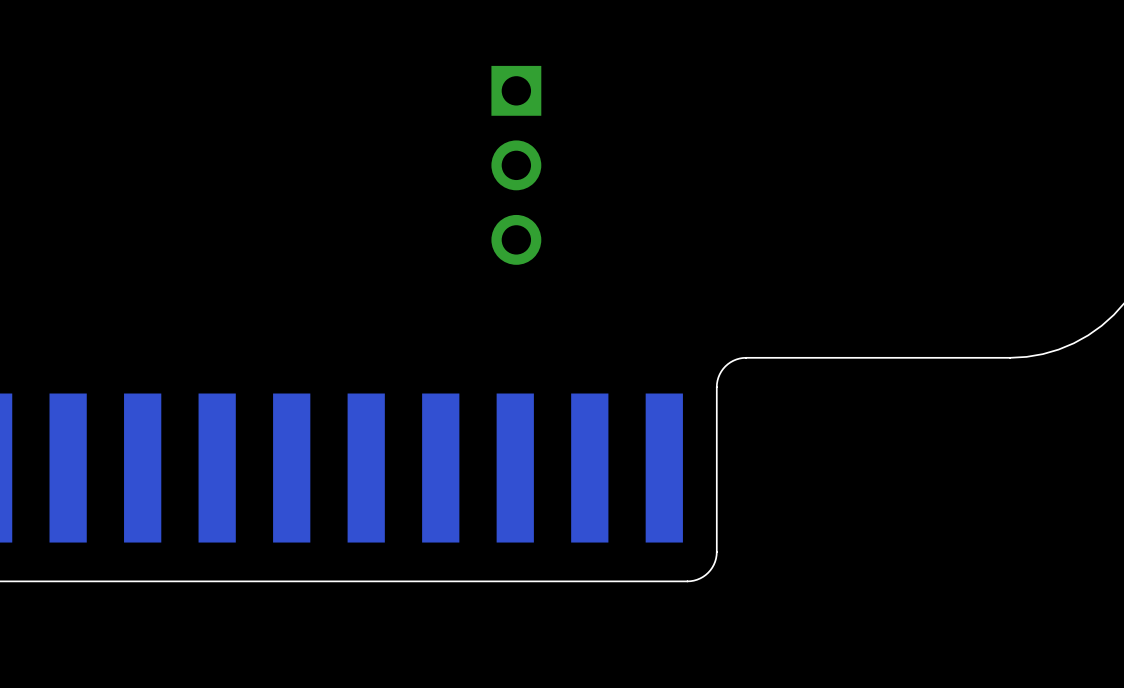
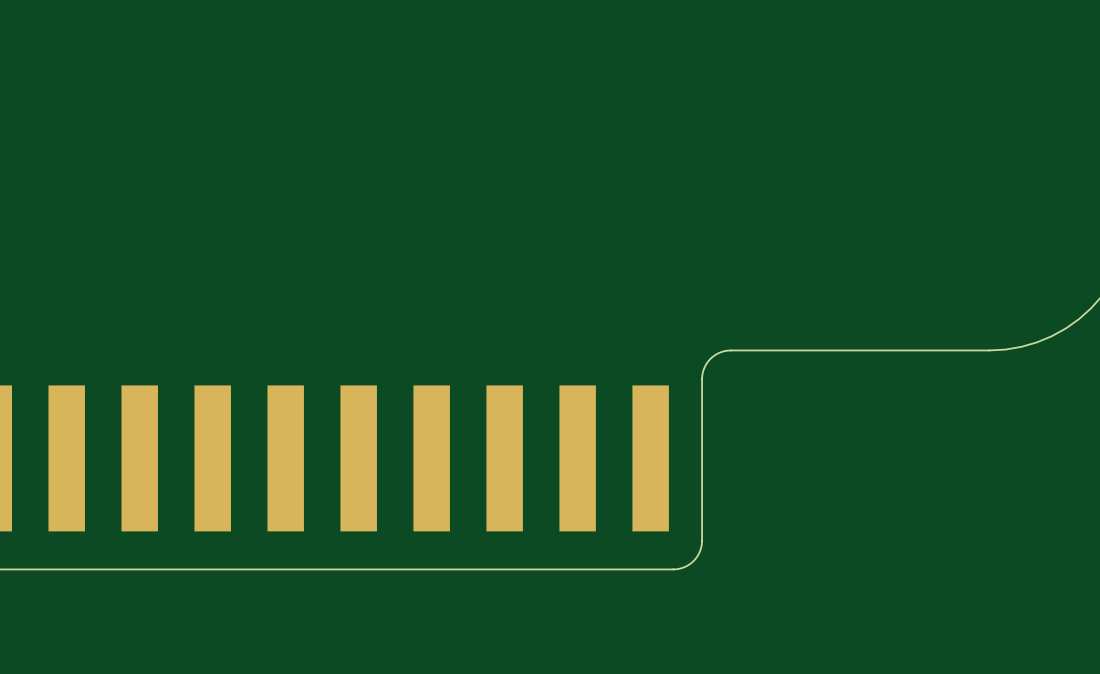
part: (516, 165) -> none

